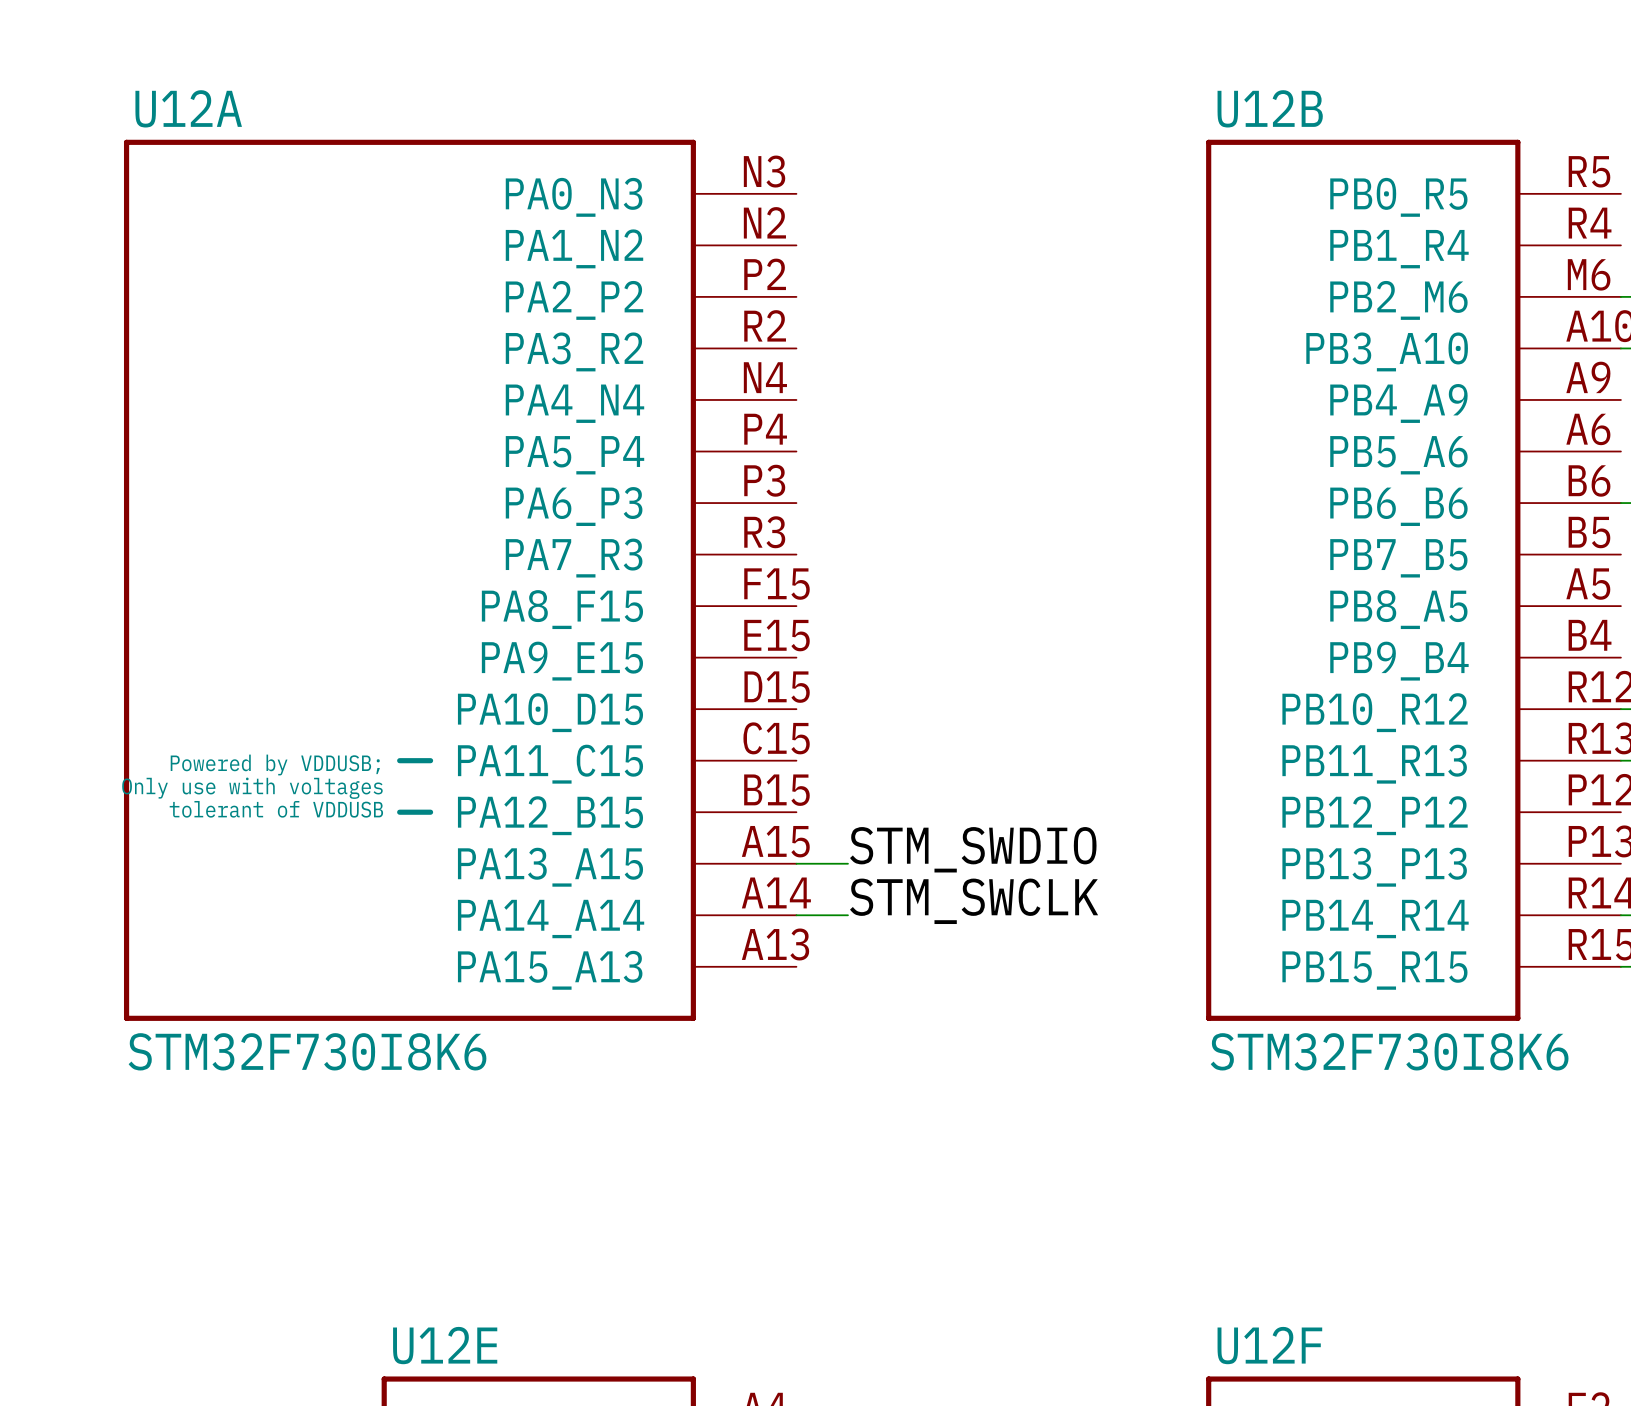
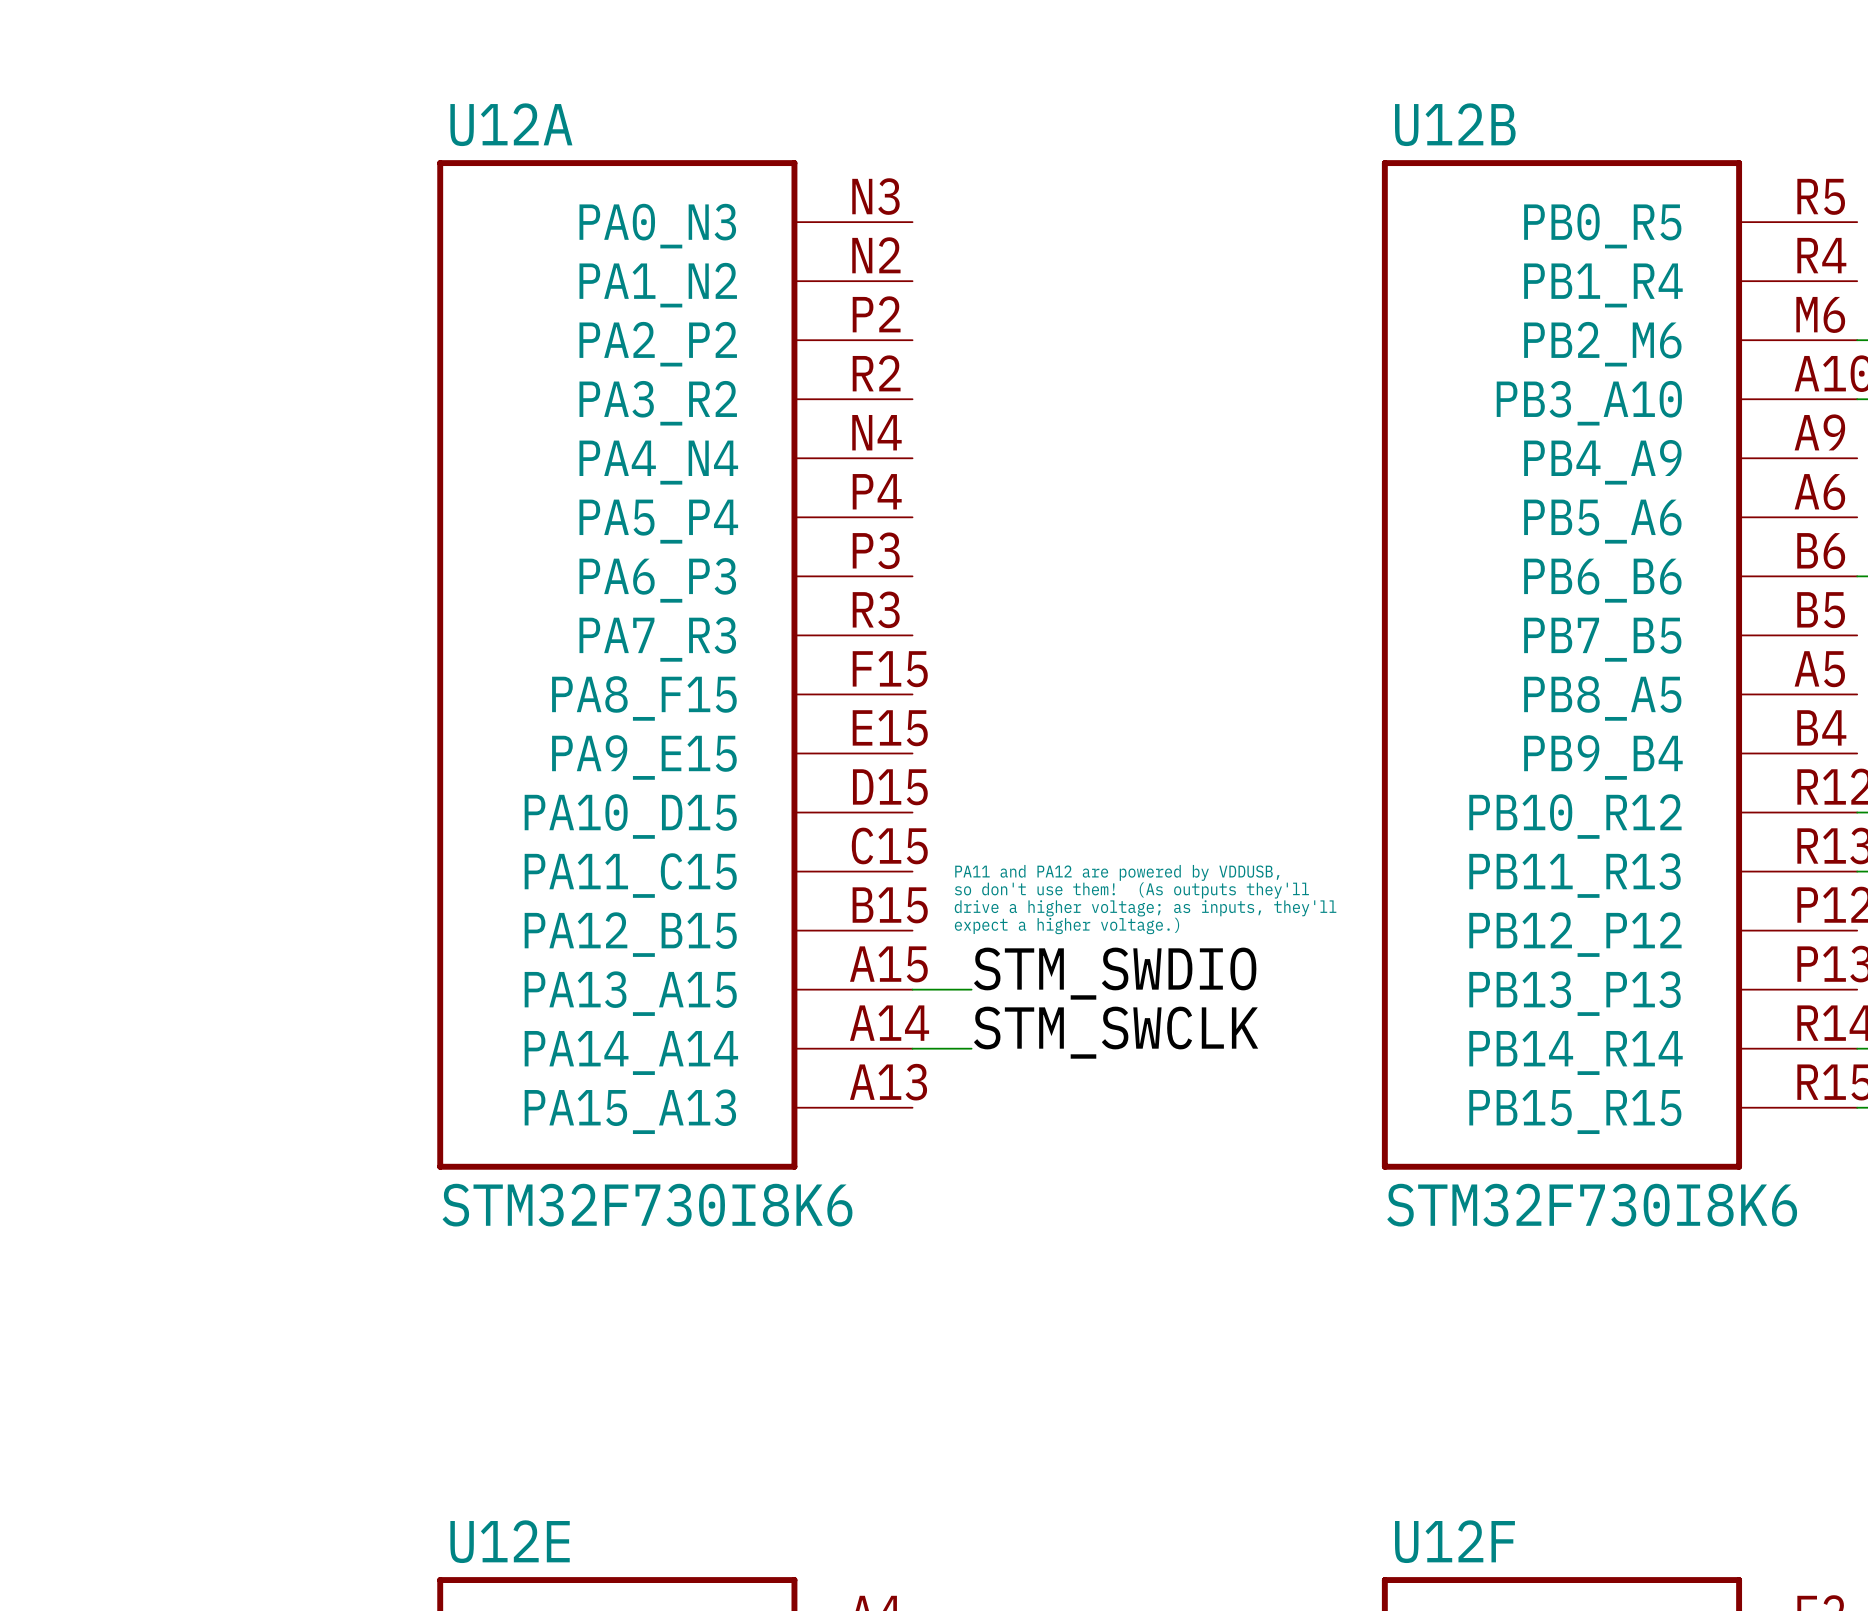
U12A name position: U12A (188, 108) -> U12A (511, 124)
U12A symbol: [123, 139, 797, 1021] -> [437, 160, 913, 1170]
text: none -> PA11 and PA12 are powered by VDDUSB, (1117, 872)
text: none -> so don't use them! (As outputs they'll (1131, 890)
text: none -> drive a higher voltage; as inputs, they'll (1145, 908)
text: none -> expect a higher voltage.) (1067, 925)
U12A text position: STM32F730I8K6 (307, 1051) -> STM32F730I8K6 (647, 1205)

